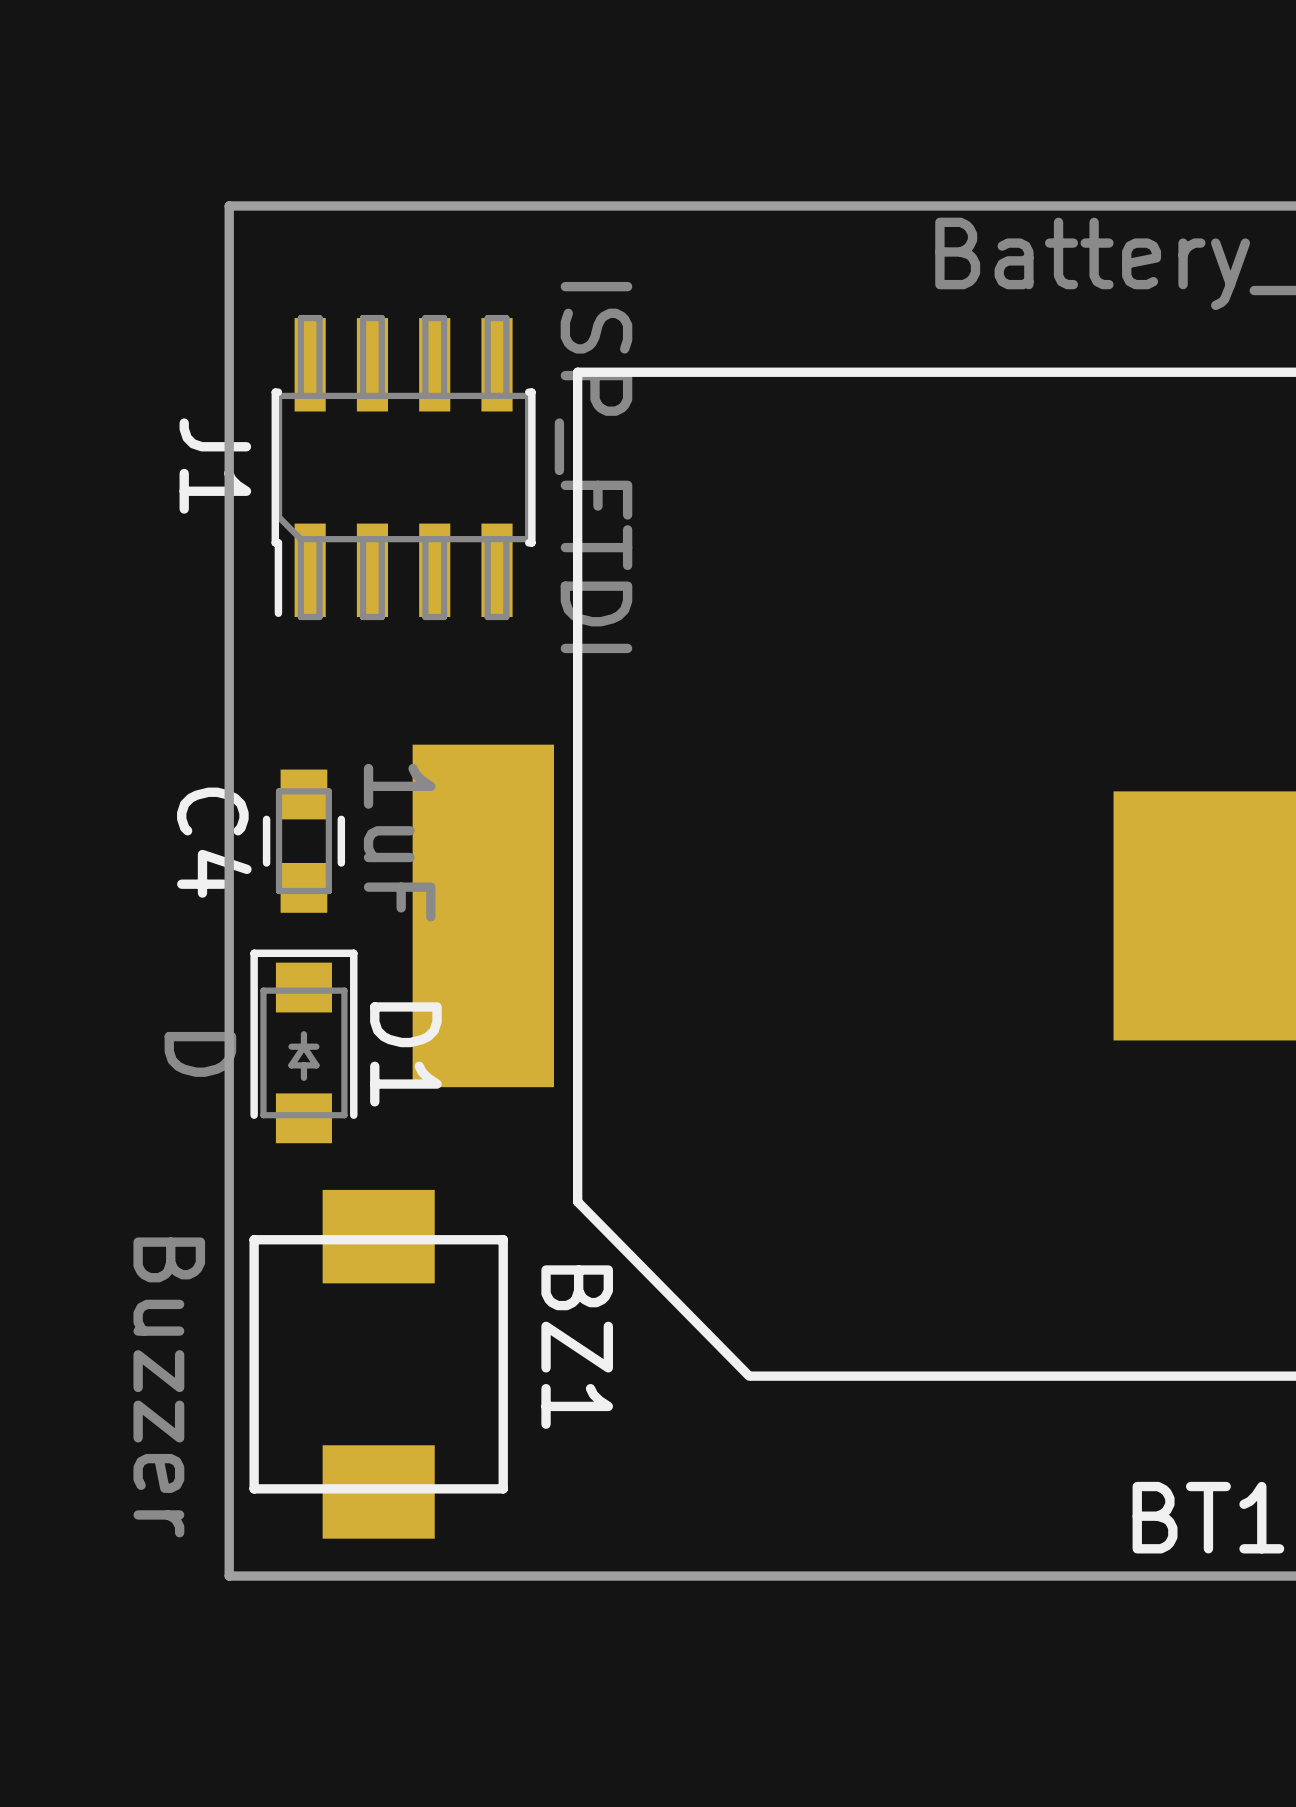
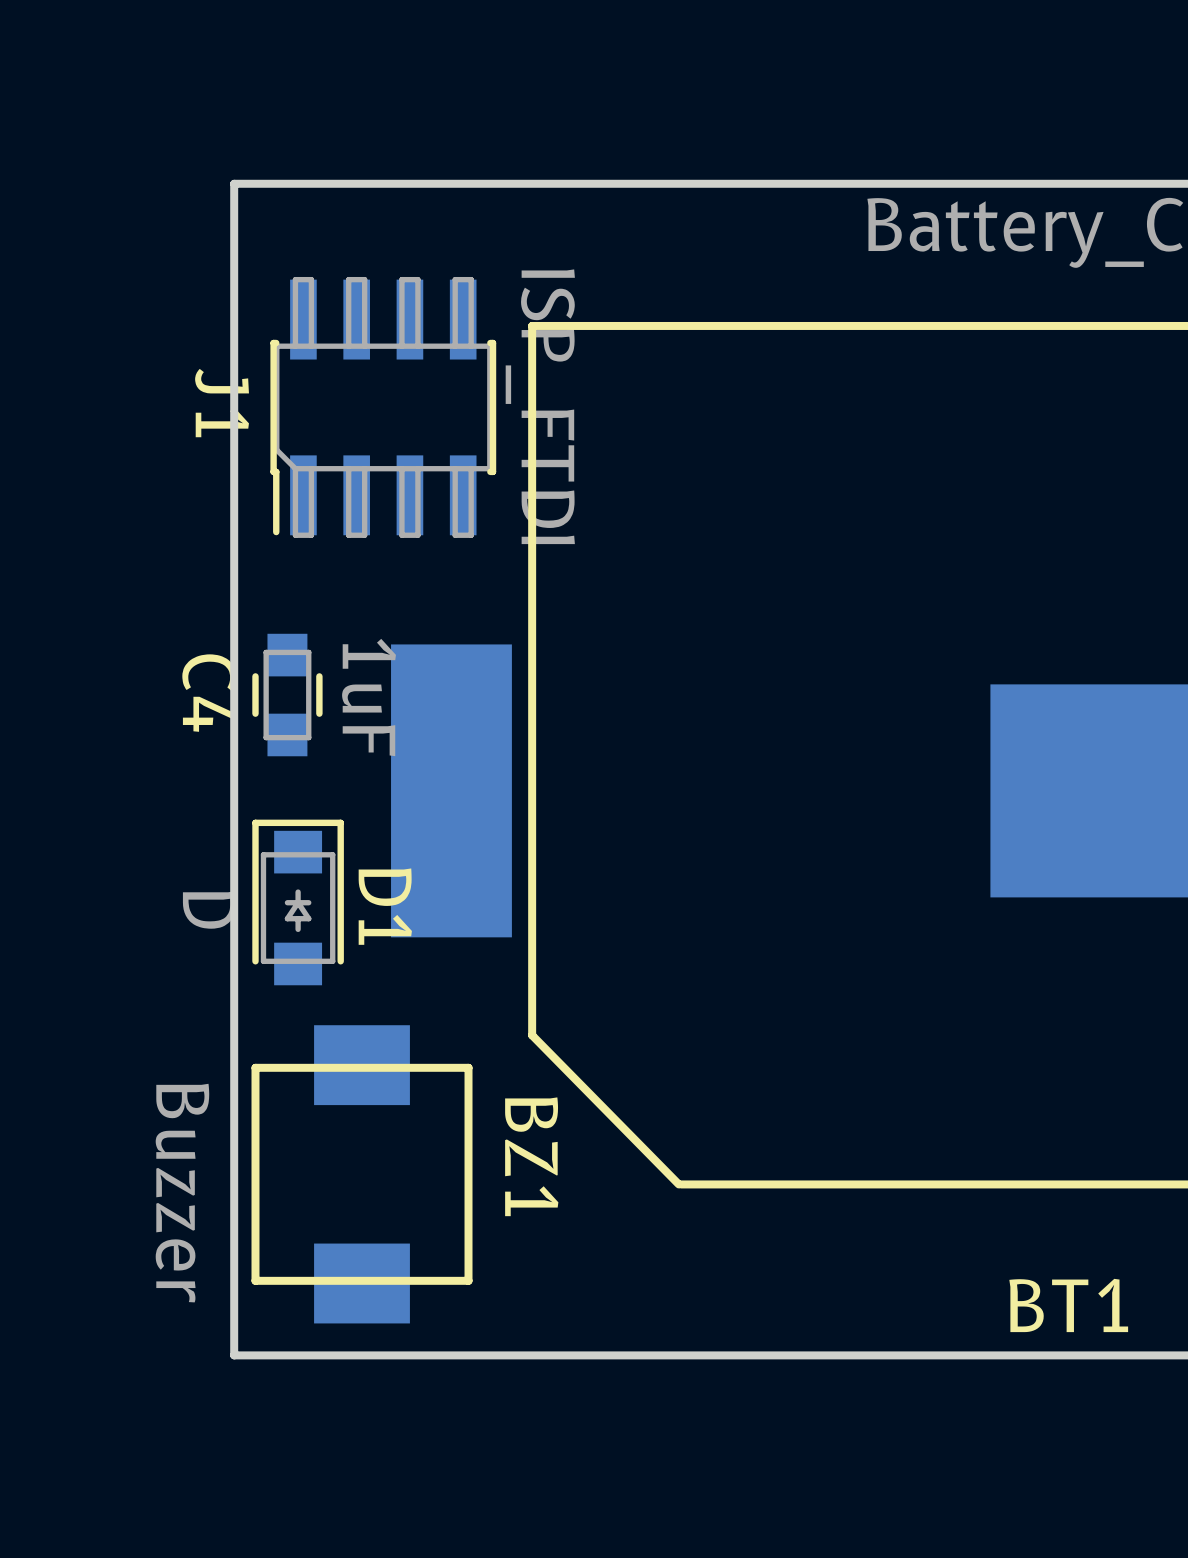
C4 position: (303, 841) -> (287, 695)

